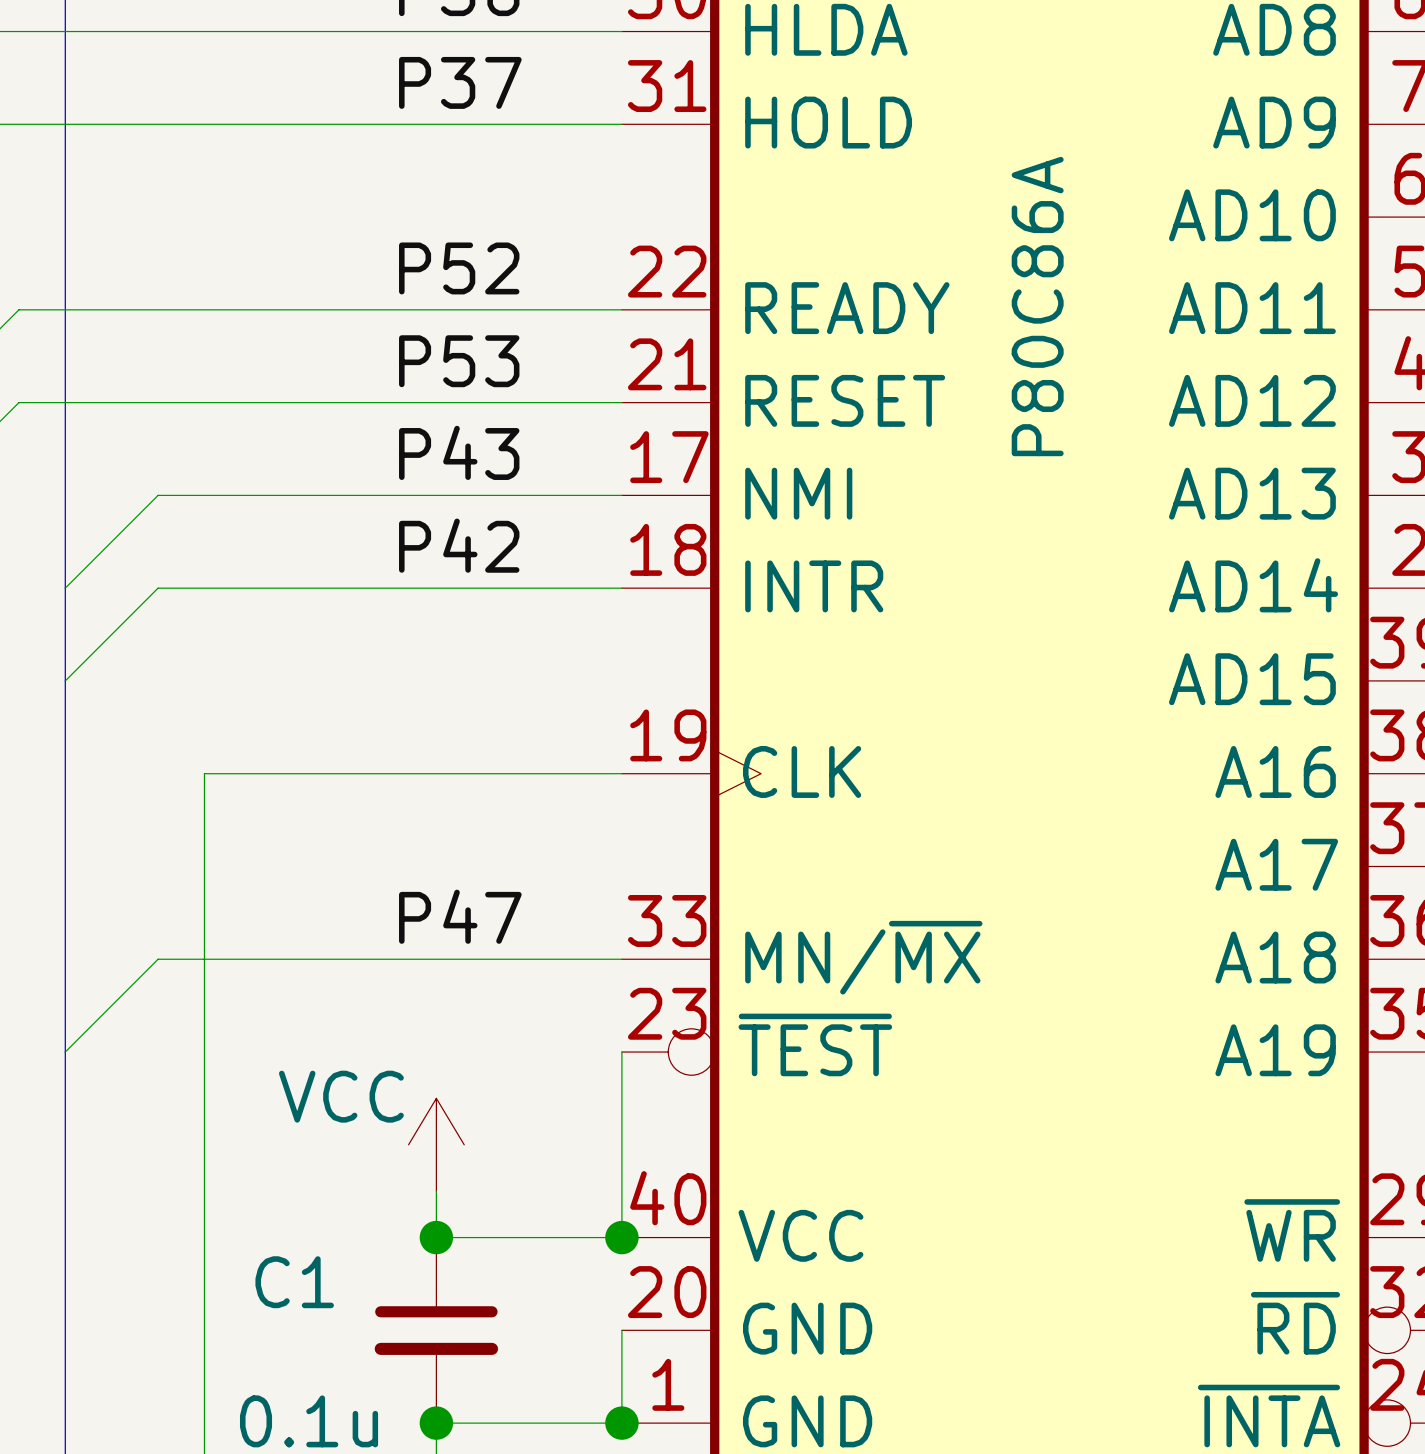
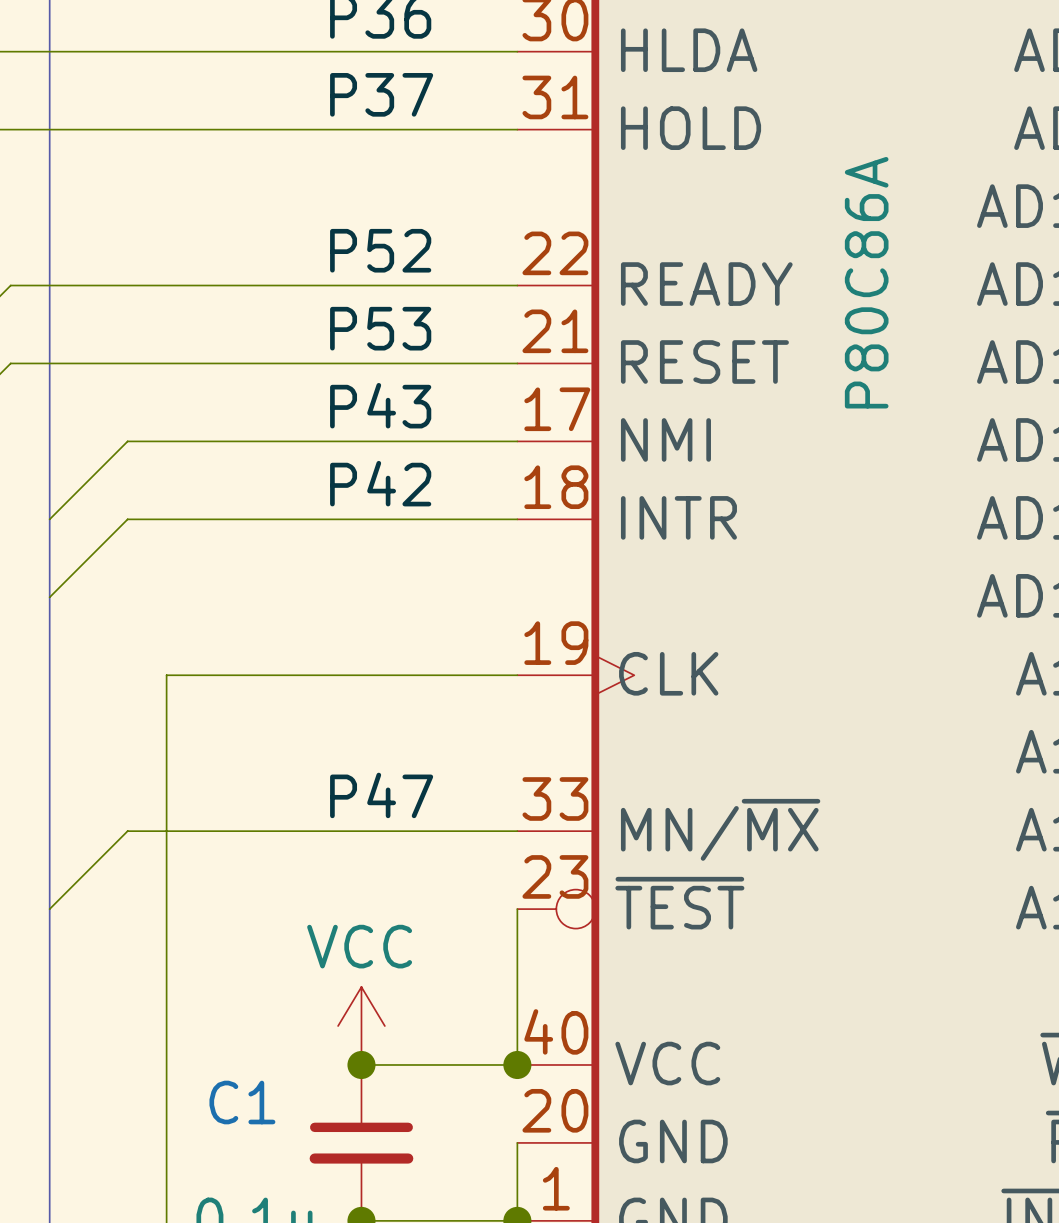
power symbol text position: VCC (341, 1096) -> VCC (359, 946)
power symbol position: VCC (436, 1144) -> VCC (361, 1026)

